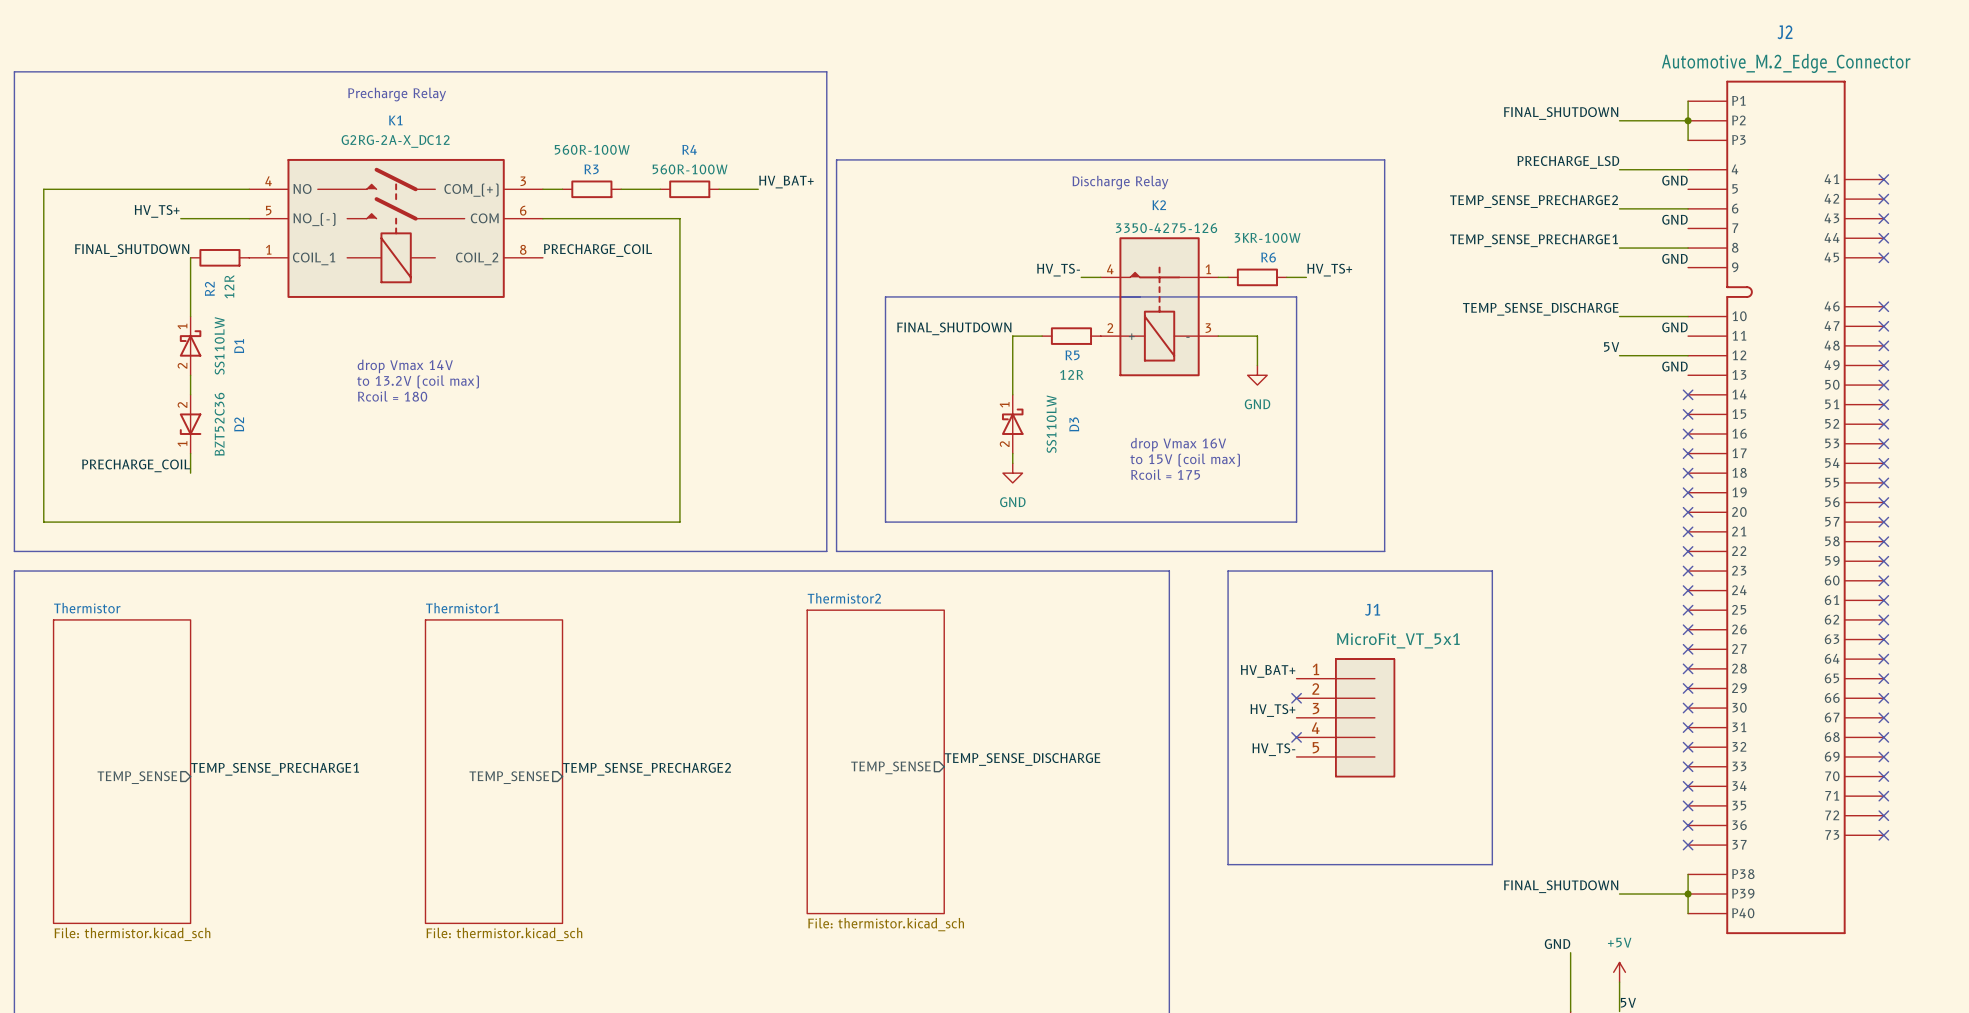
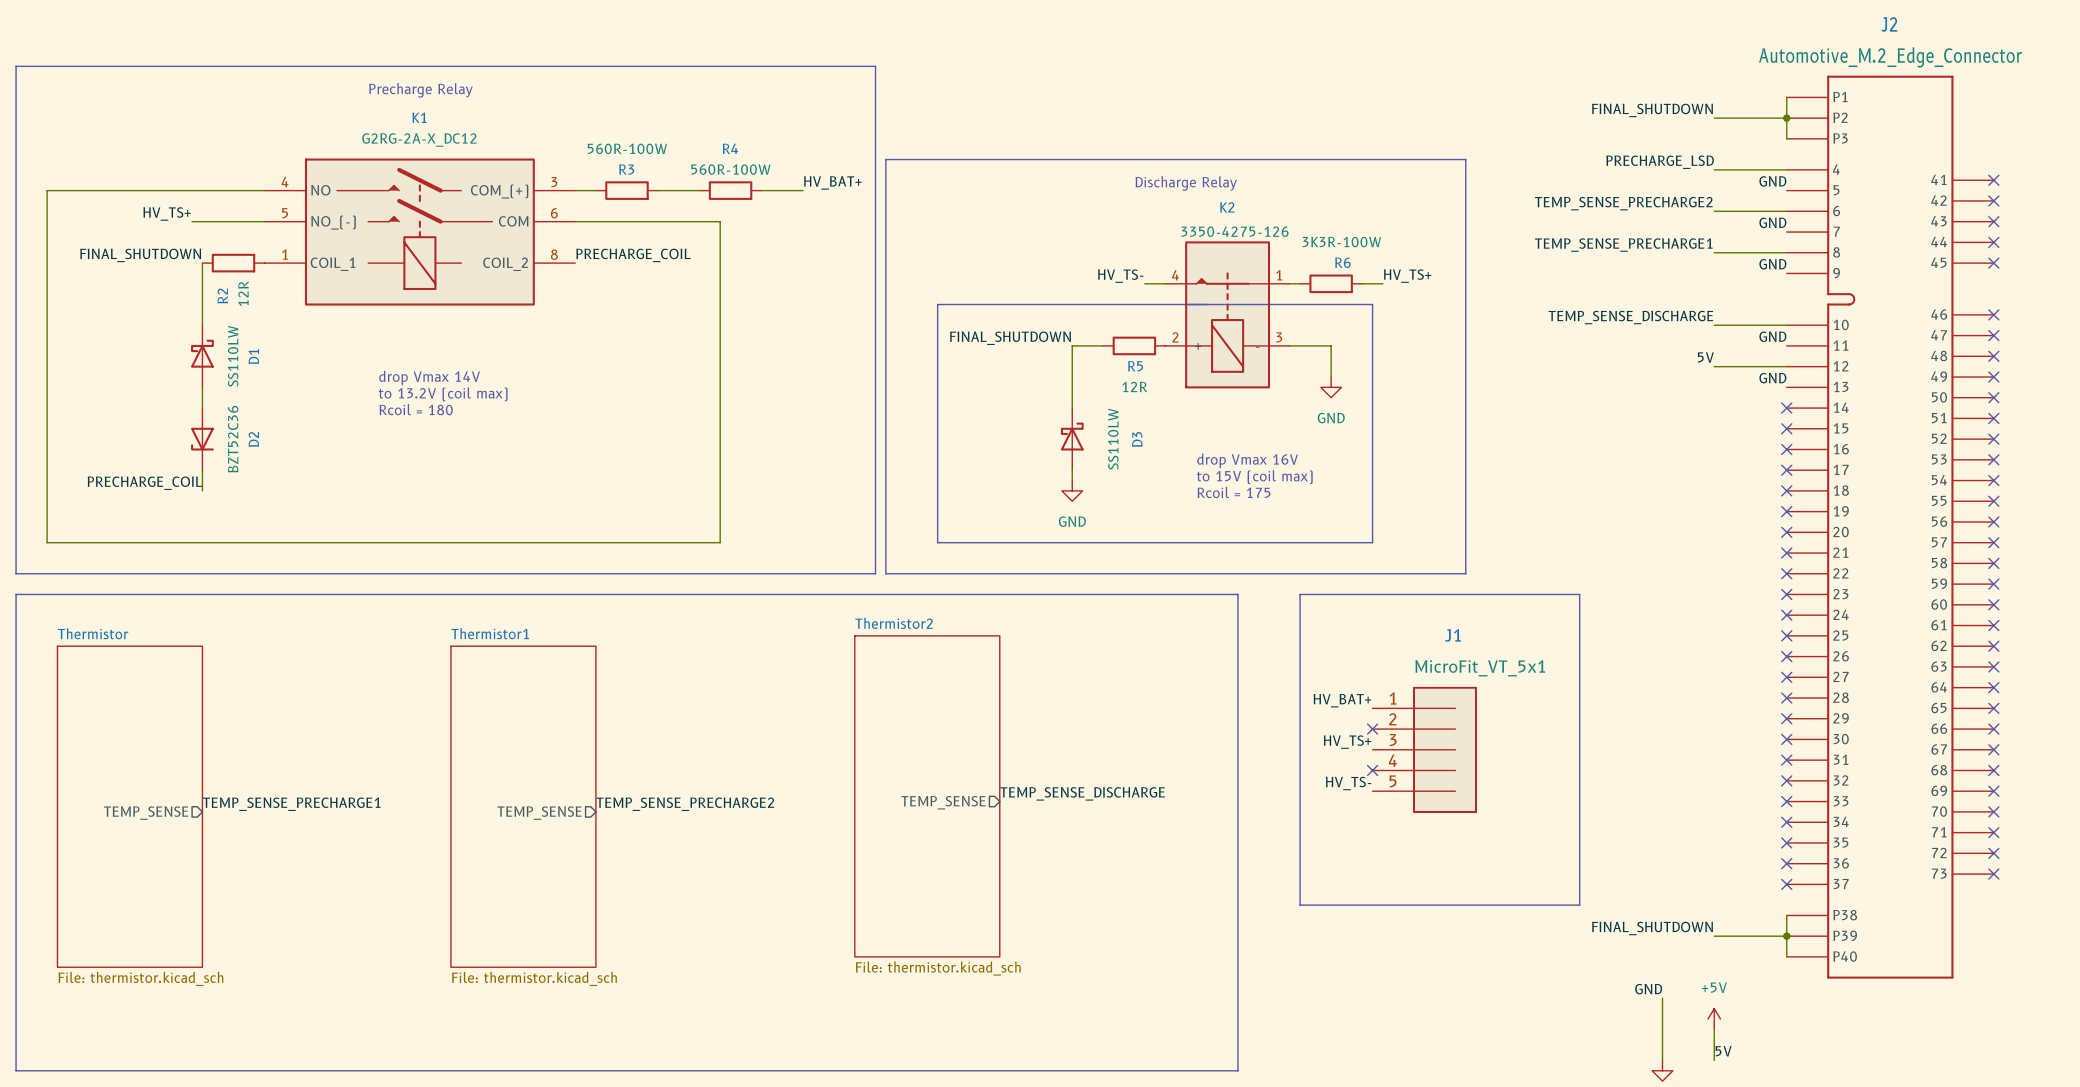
R6 value: 3KR-100W (1267, 237) -> 3K3R-100W (1341, 242)
D1 pin number: 1 (182, 326) -> none
D1 pin number: 2 (182, 365) -> none
D2 pin number: 2 (182, 404) -> none
D3 pin number: 1 (1004, 404) -> none
D2 pin number: 1 (182, 443) -> none
D3 pin number: 2 (1004, 444) -> none

